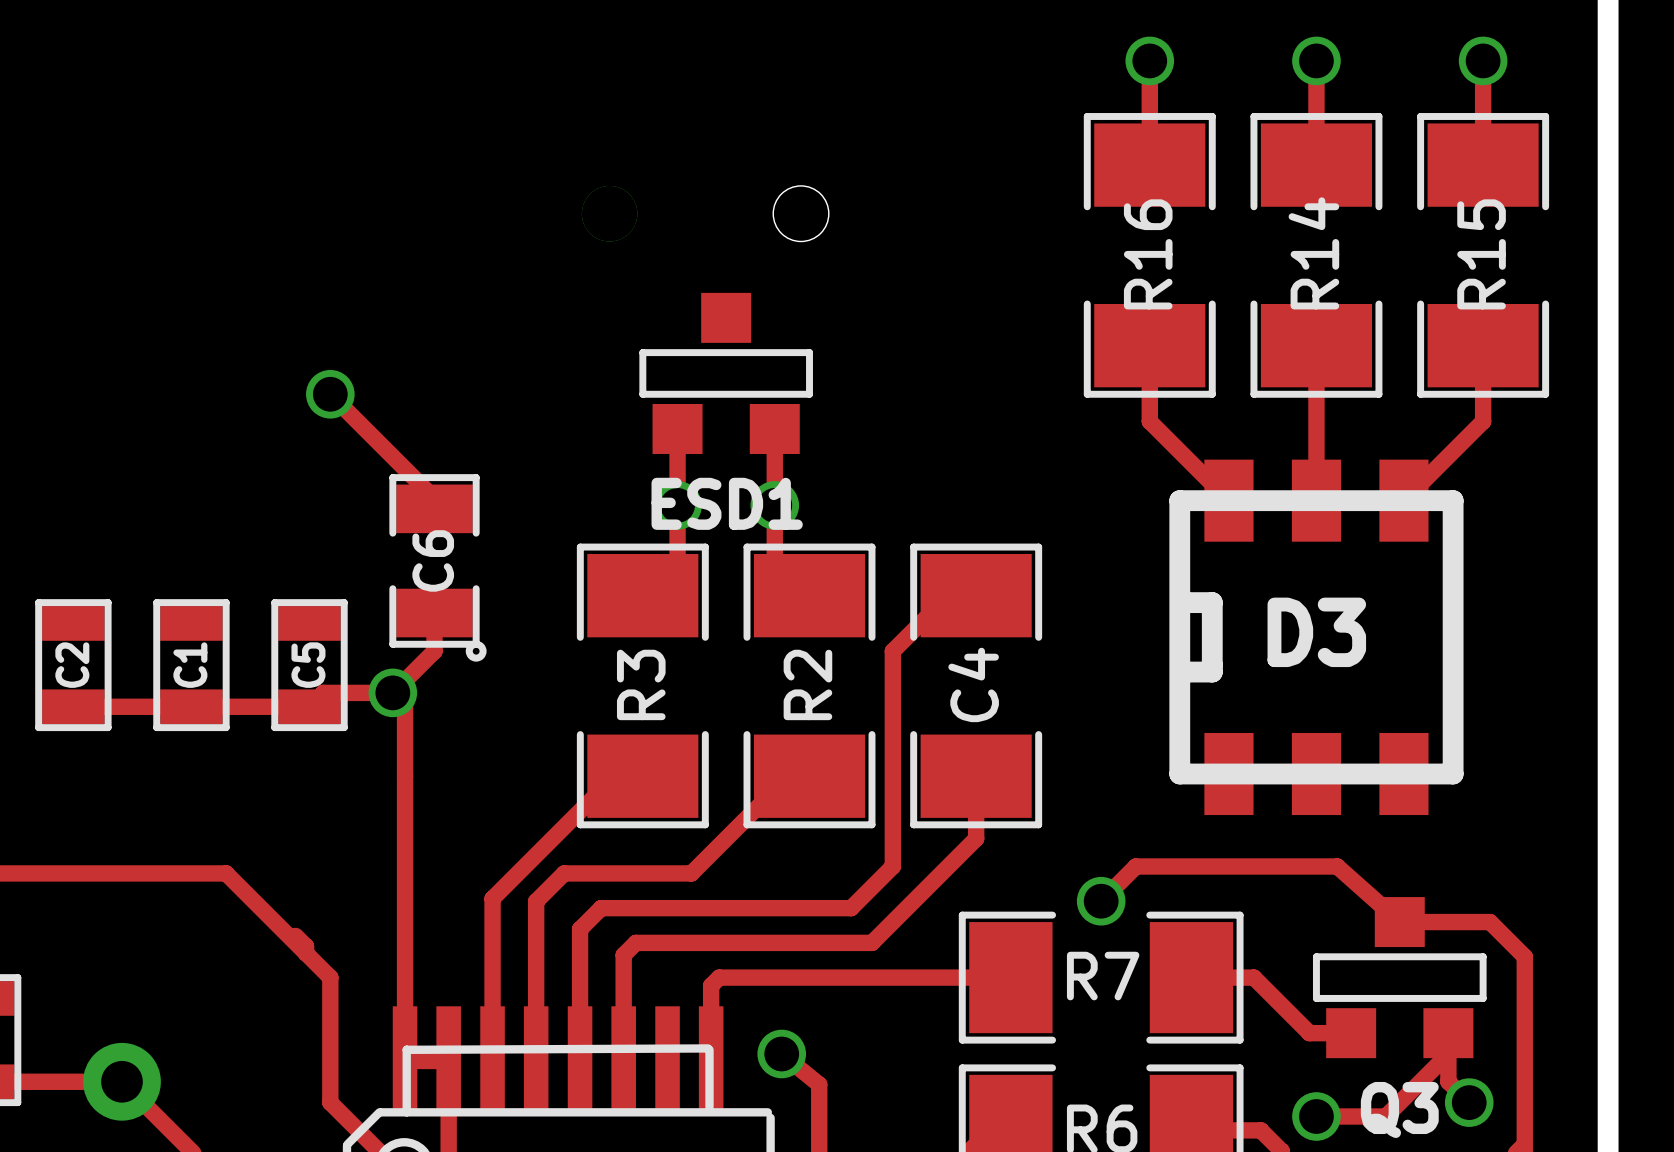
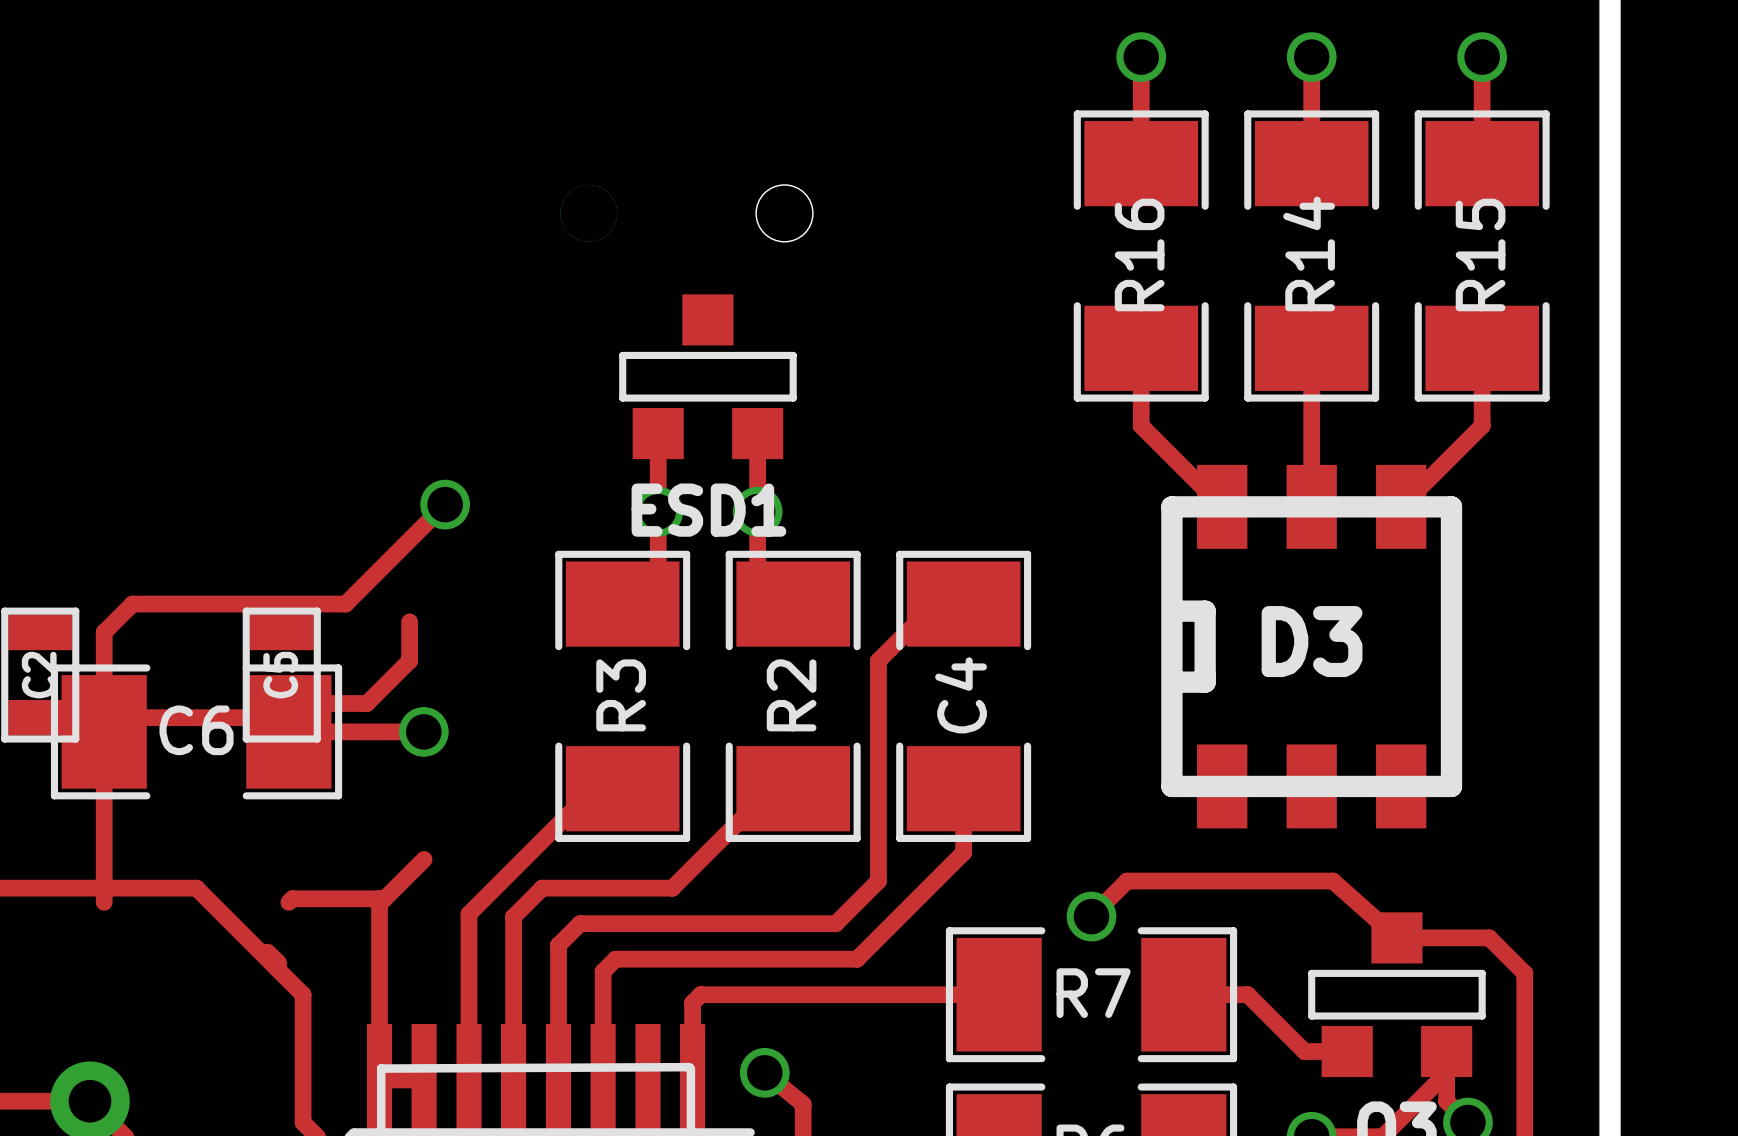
track: (330, 394) (434, 498) (434, 508) -> none
via: (330, 394) -> none
C6 footprint: [389, 474, 487, 662] -> [50, 664, 343, 800]
track: none -> (445, 504) (345, 604) (132, 604) (104, 632) (104, 902)
via: none -> (445, 504)
C1: (191, 665) -> none
track: (392, 692) (405, 705) (405, 883) -> (288, 902) (292, 898) (379, 898)
via position: (392, 692) -> (423, 731)
track: none -> (288, 731) (423, 731)
track: none -> (424, 859) (379, 904)

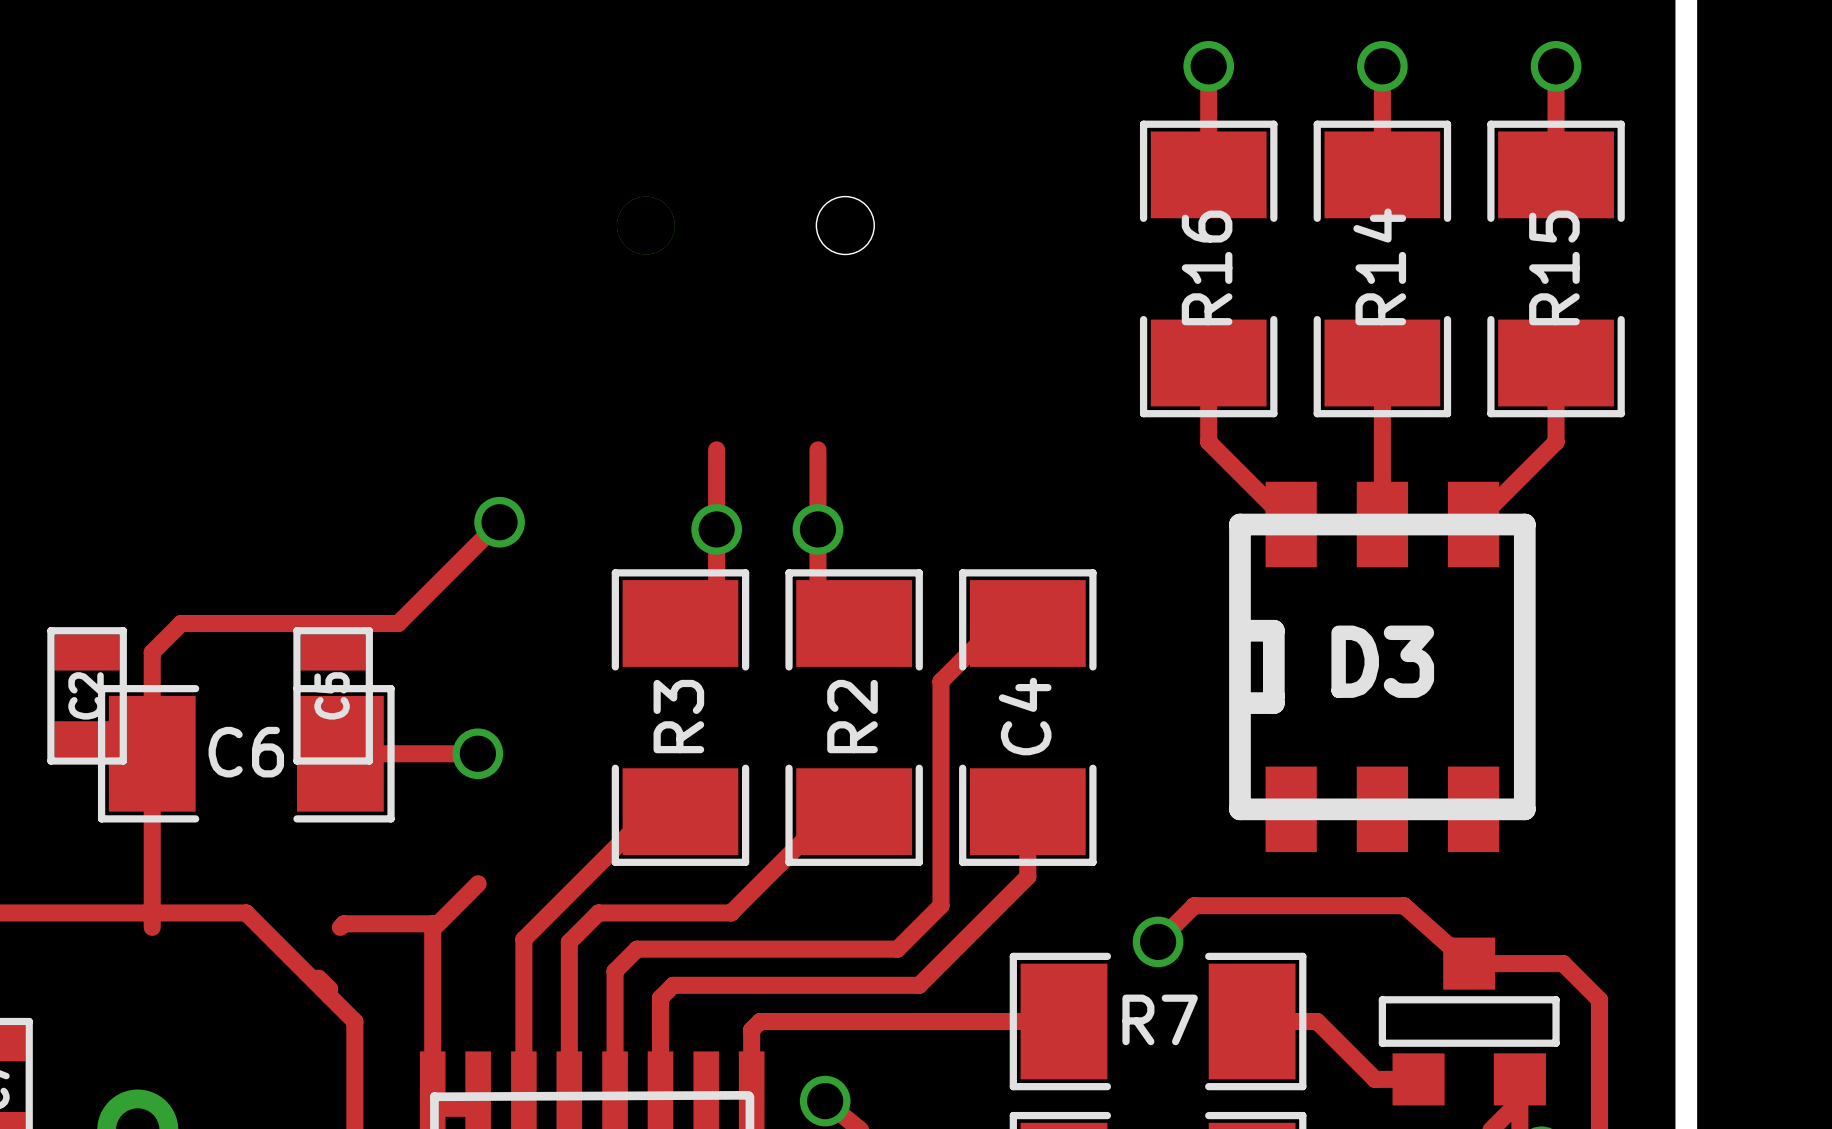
ESD1: (707, 376) -> none
track: (409, 621) (409, 660) (367, 703) (295, 703) (281, 717) (40, 717) -> none

